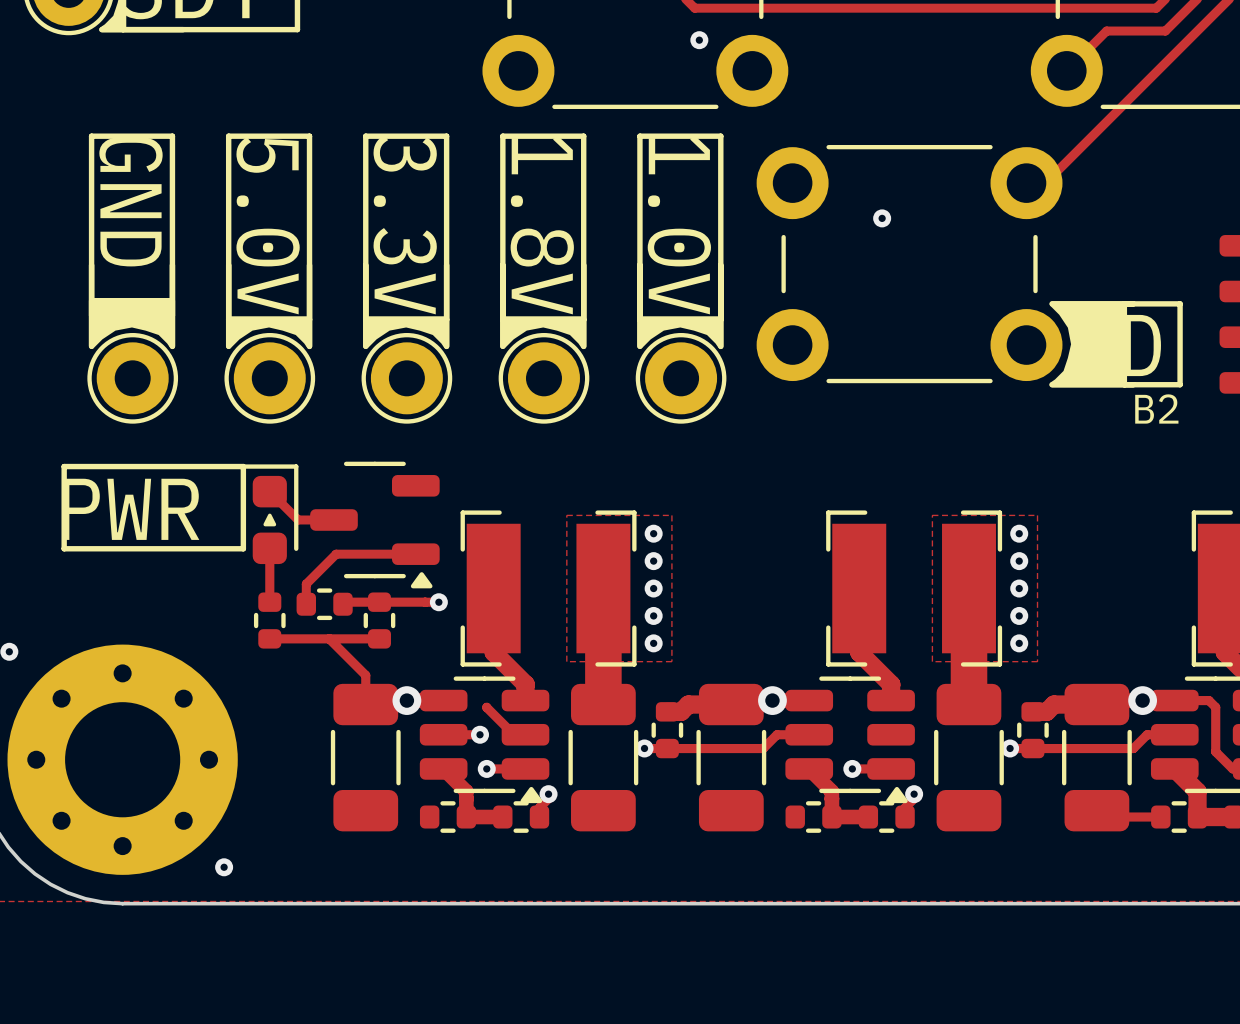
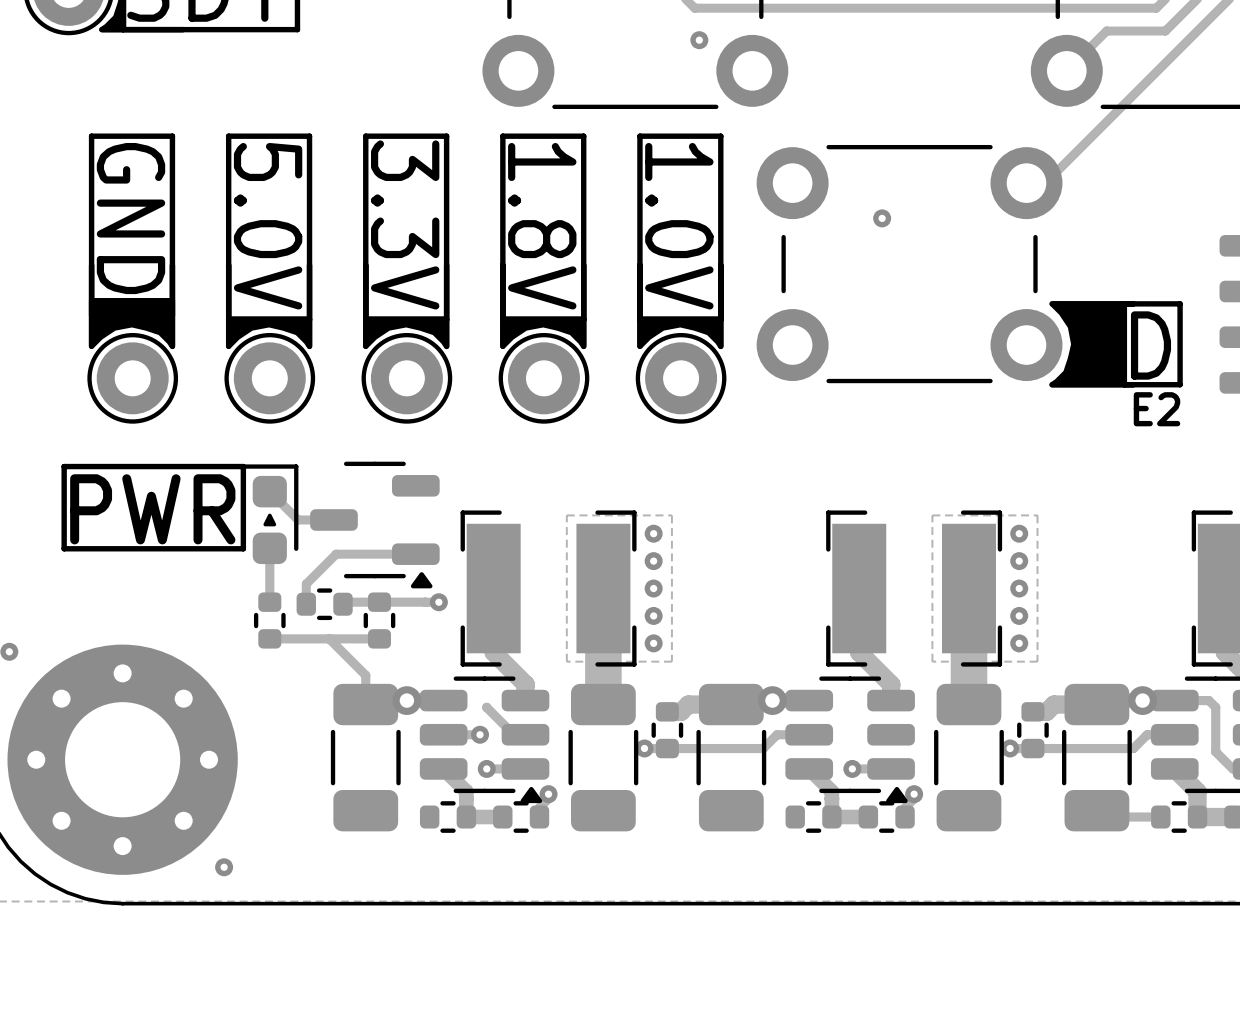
text: B2 (1156, 408) -> E2 (1157, 409)

